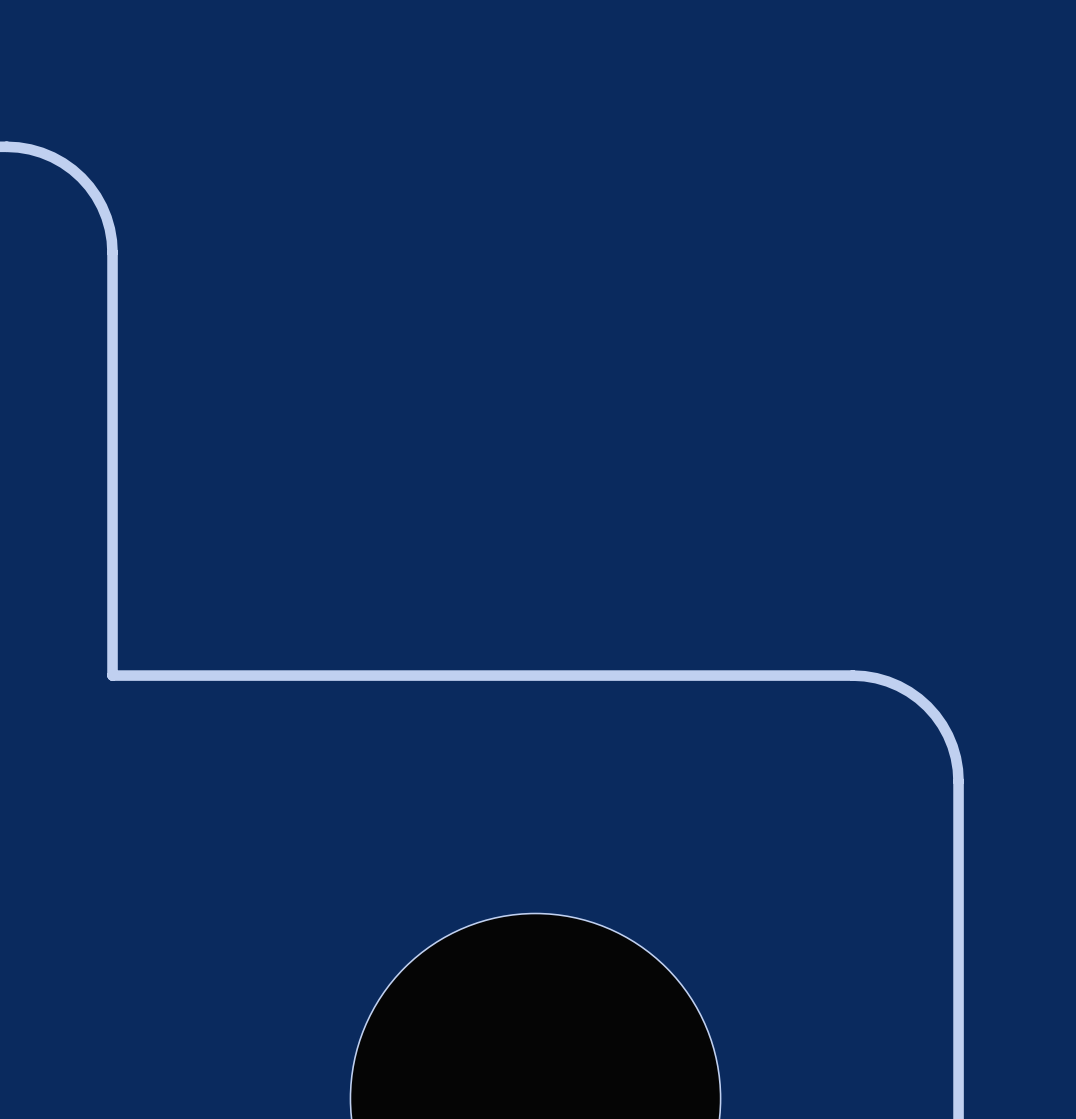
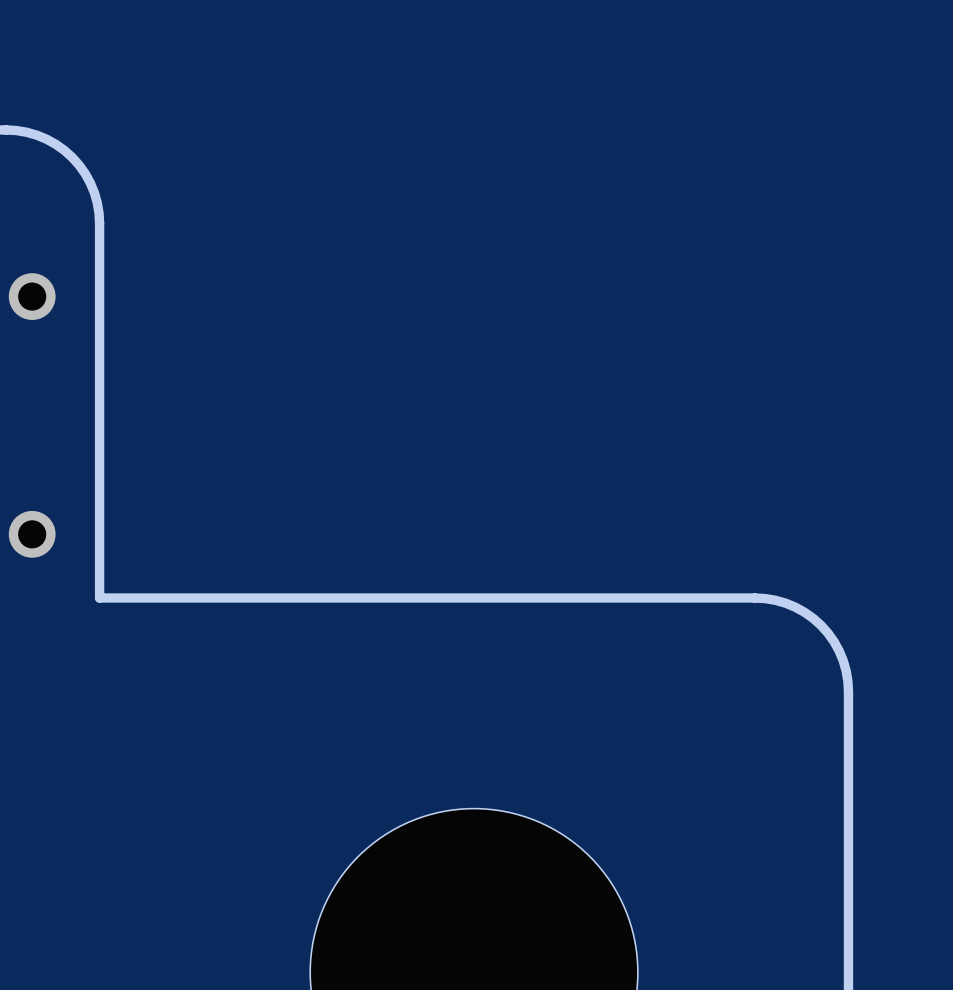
via: none -> (32, 296)
via: none -> (32, 534)

